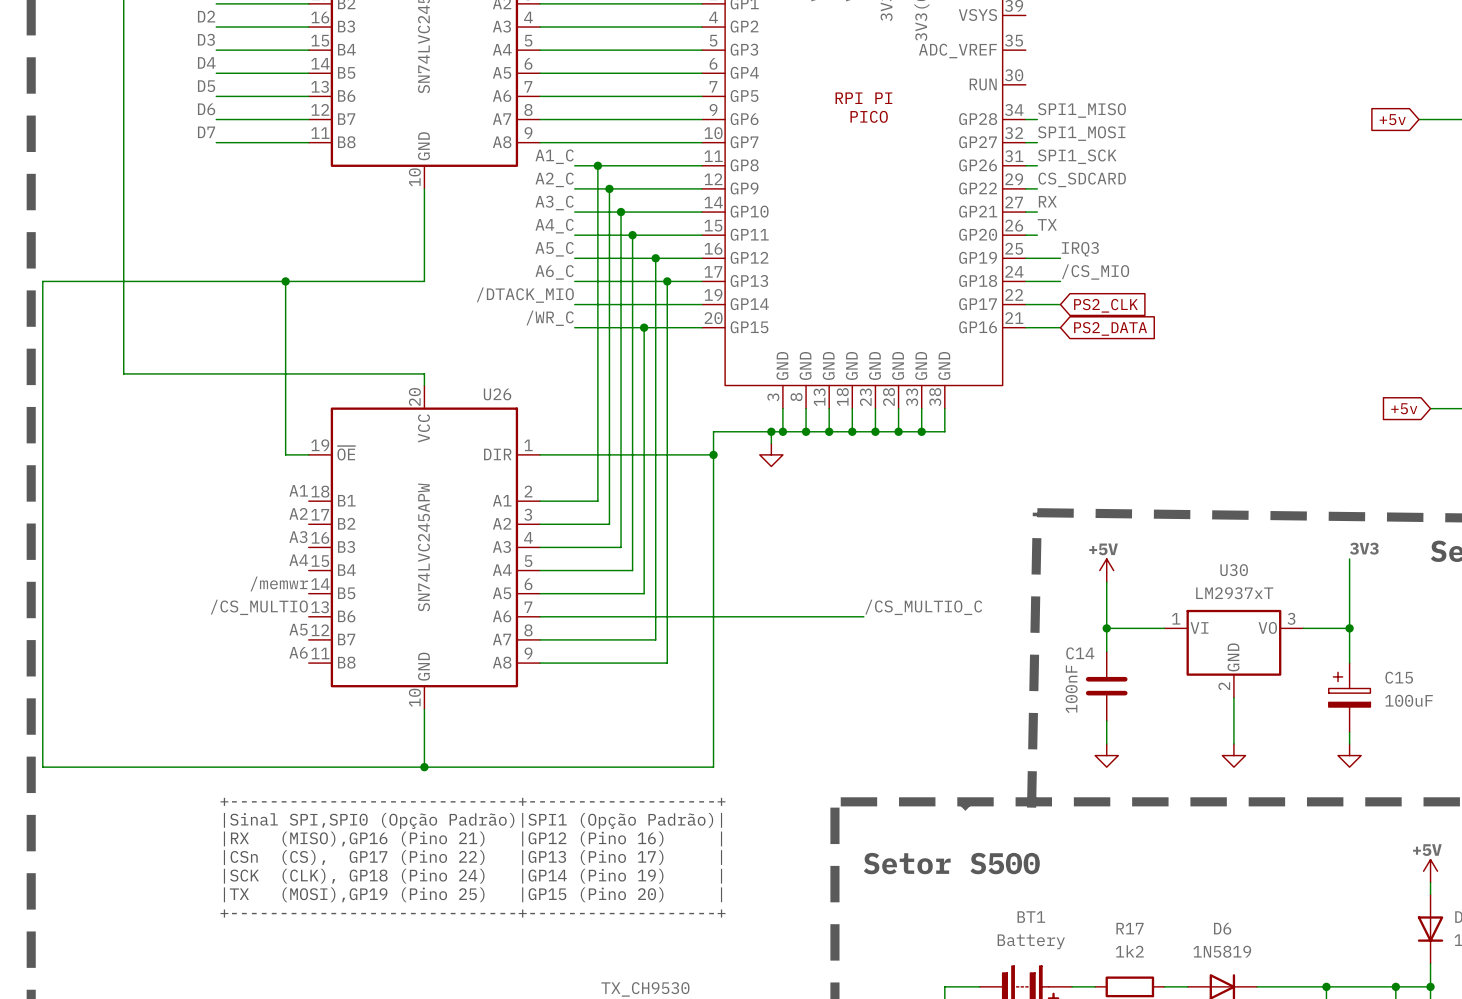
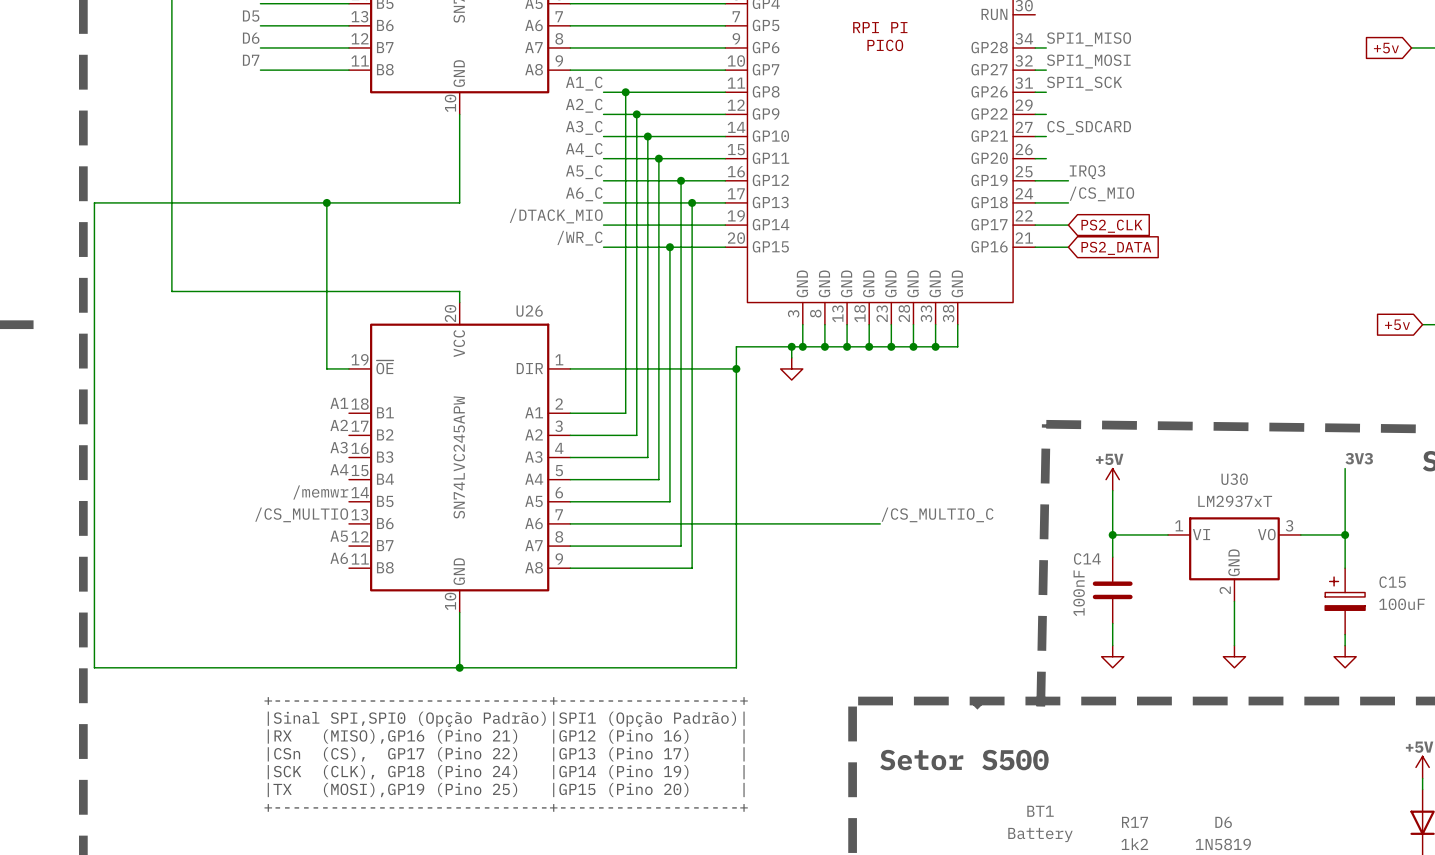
label: CS_SDCARD (1082, 179) -> none
label: RX (1047, 201) -> CS_SDCARD (1089, 127)
label: TX (1047, 224) -> none

